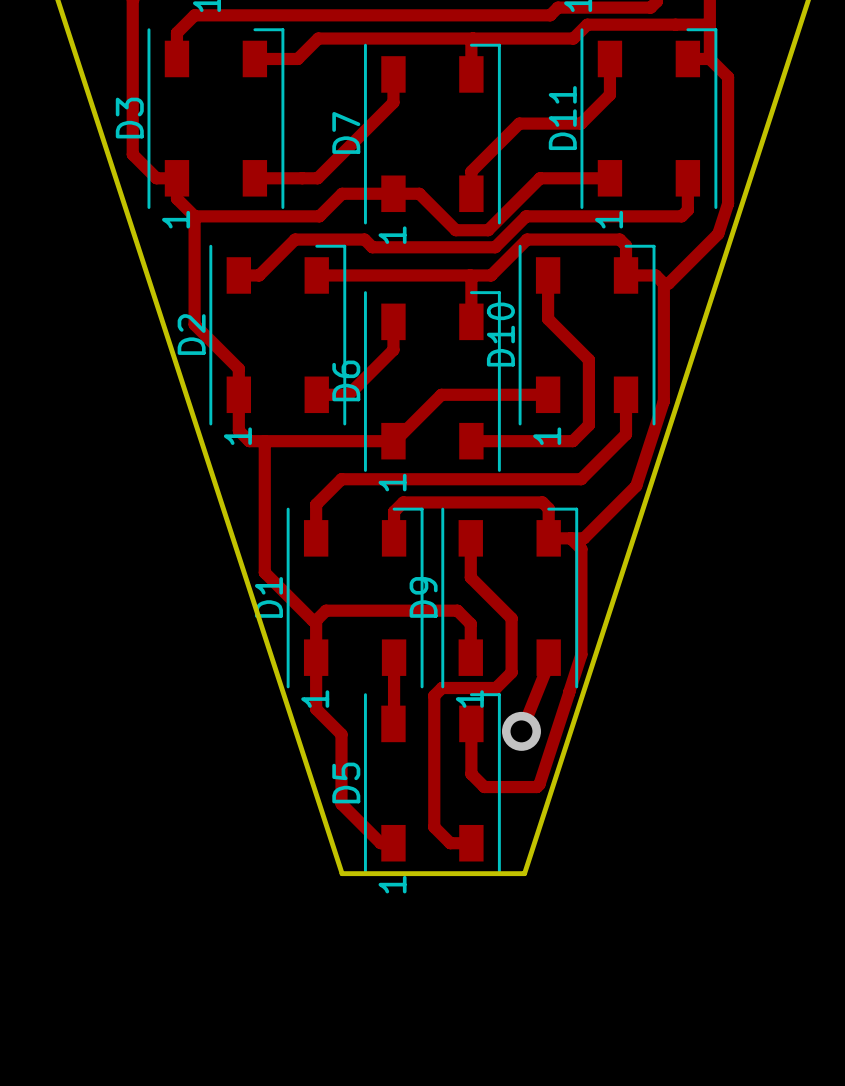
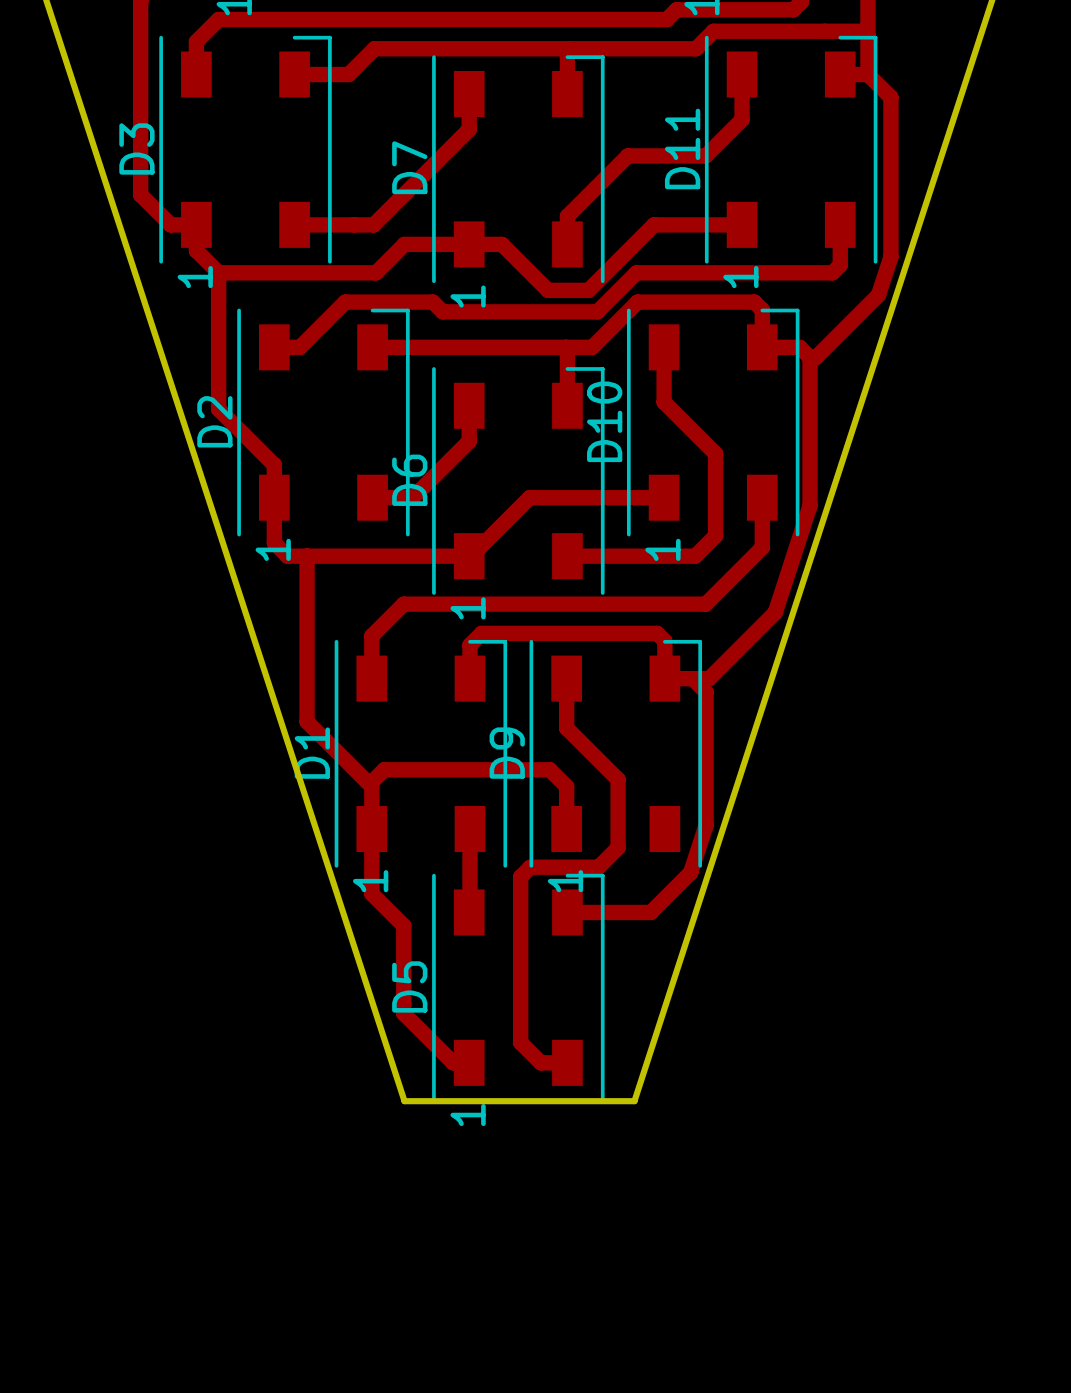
track: (548, 657) (548, 663) (521, 731) -> none
track: (569, 692) (539, 784) (536, 787) (484, 787) (471, 774) (471, 723) -> (690, 872) (650, 912) (567, 912)
via: (521, 731) -> none

